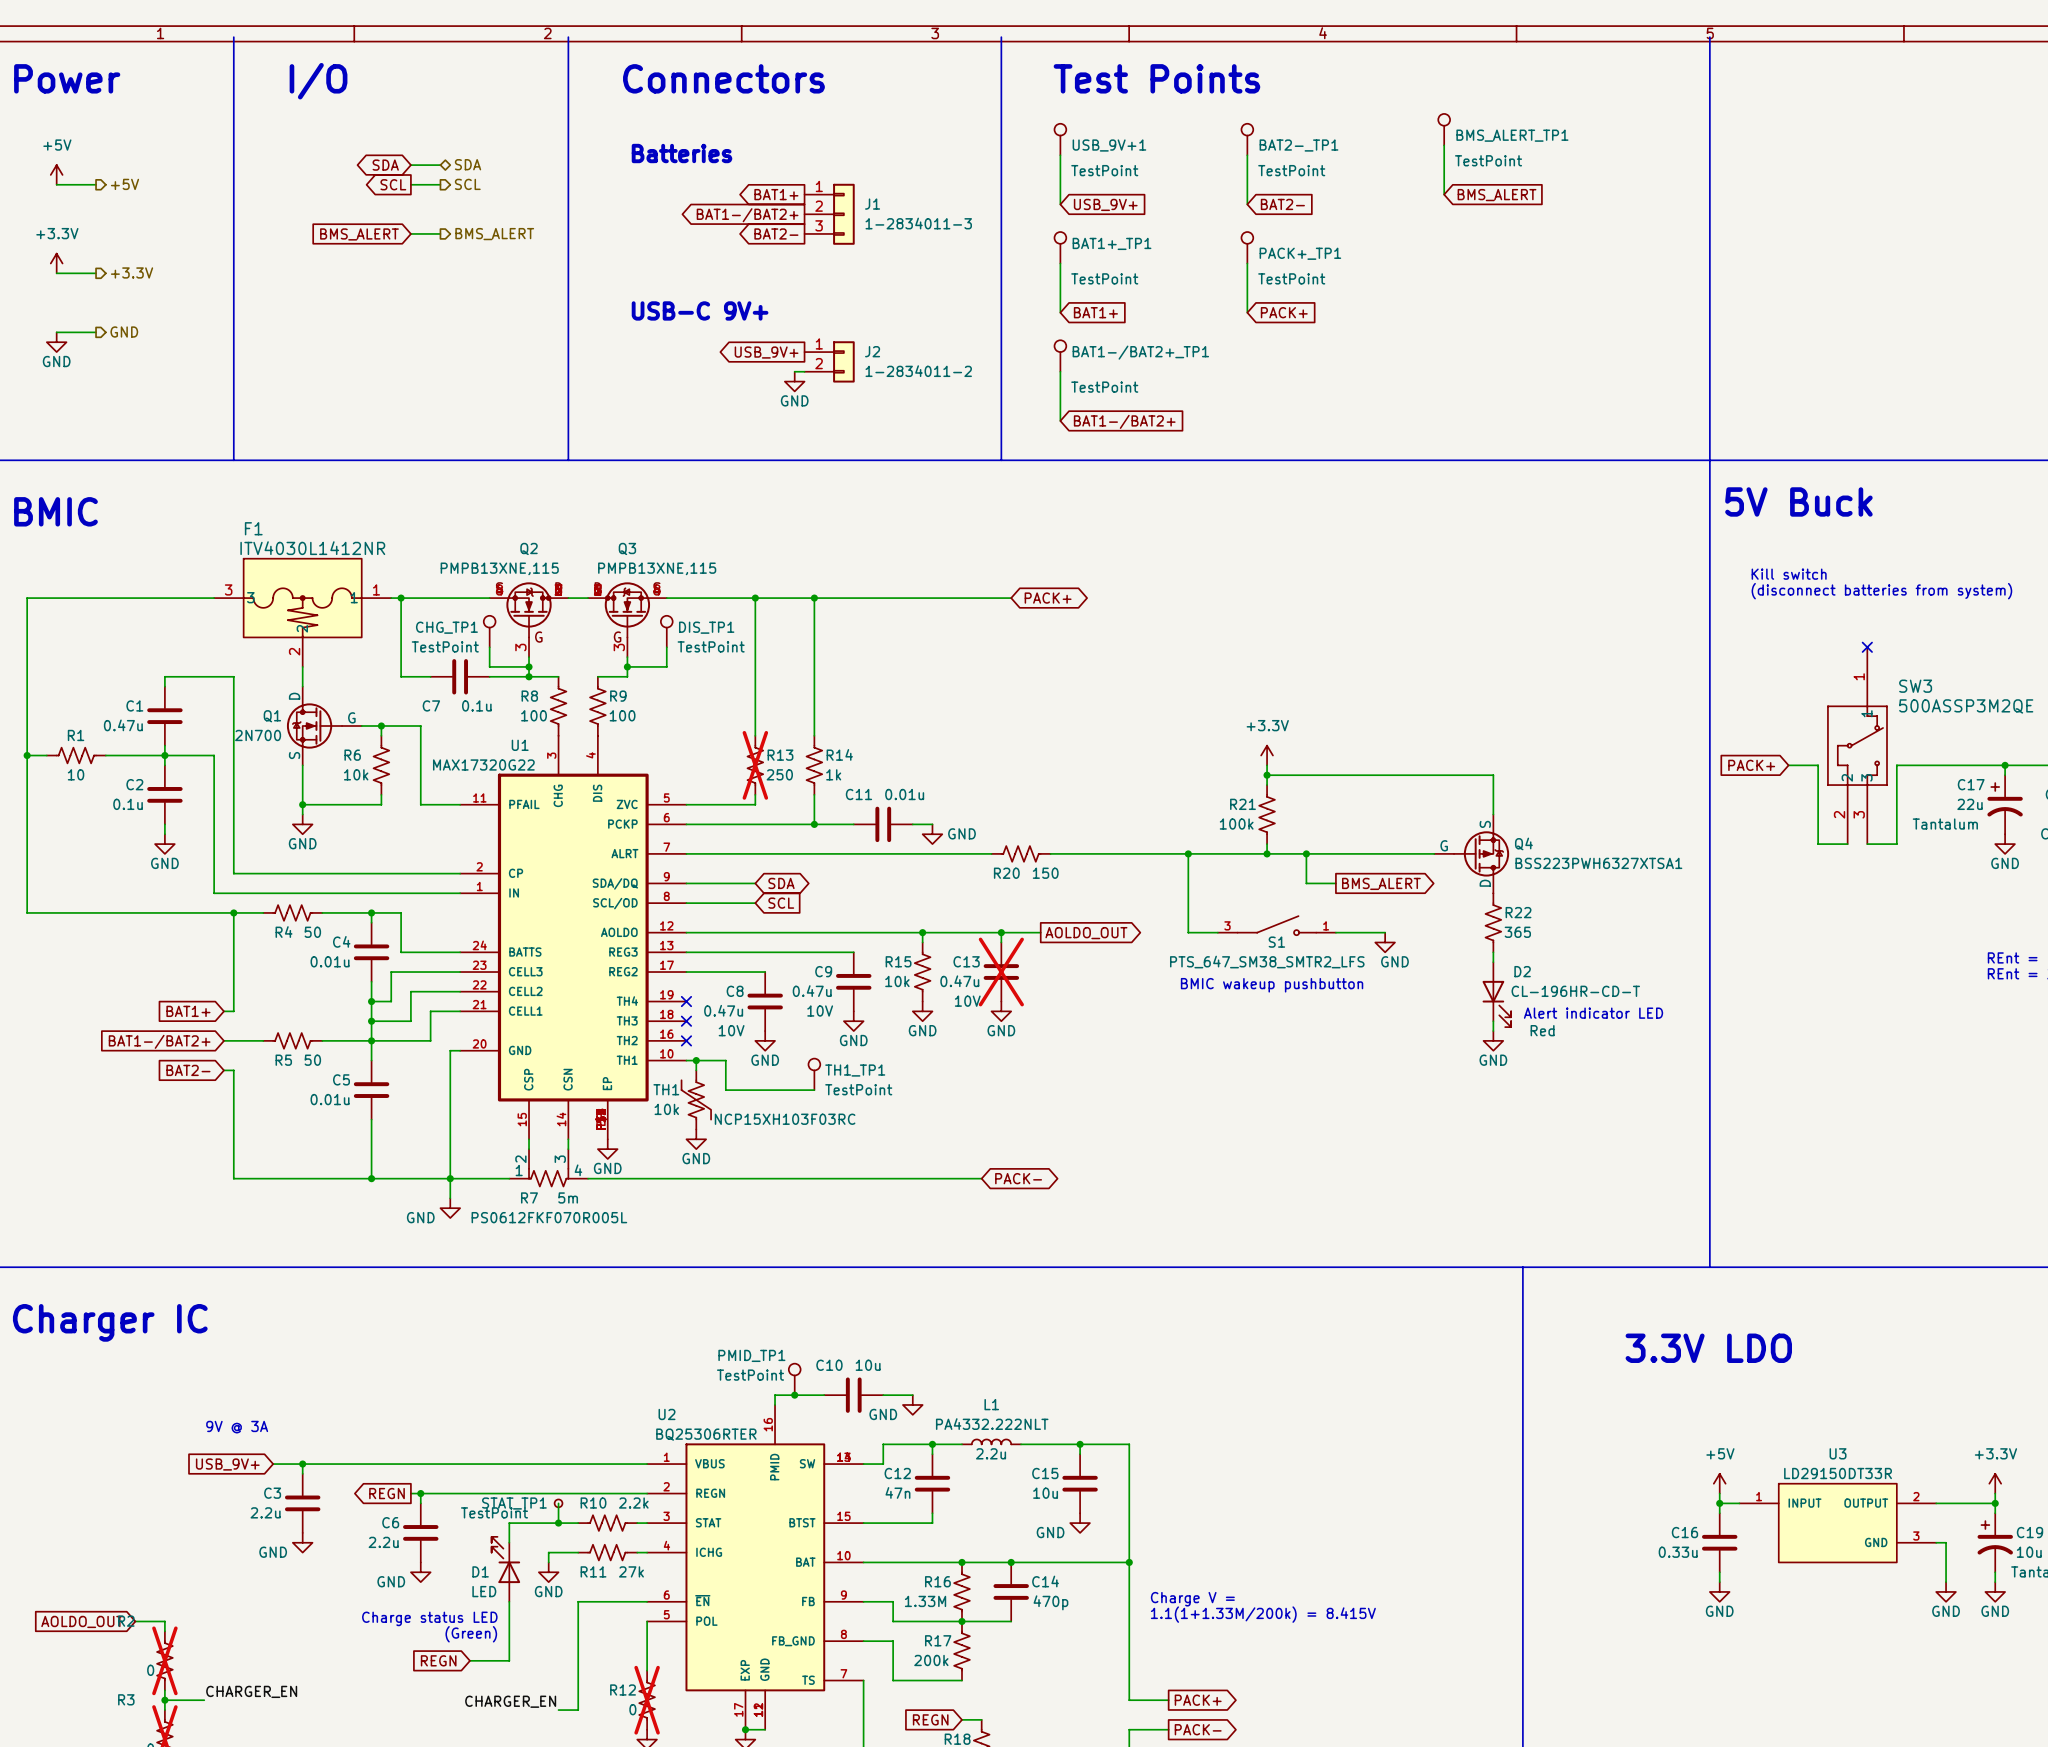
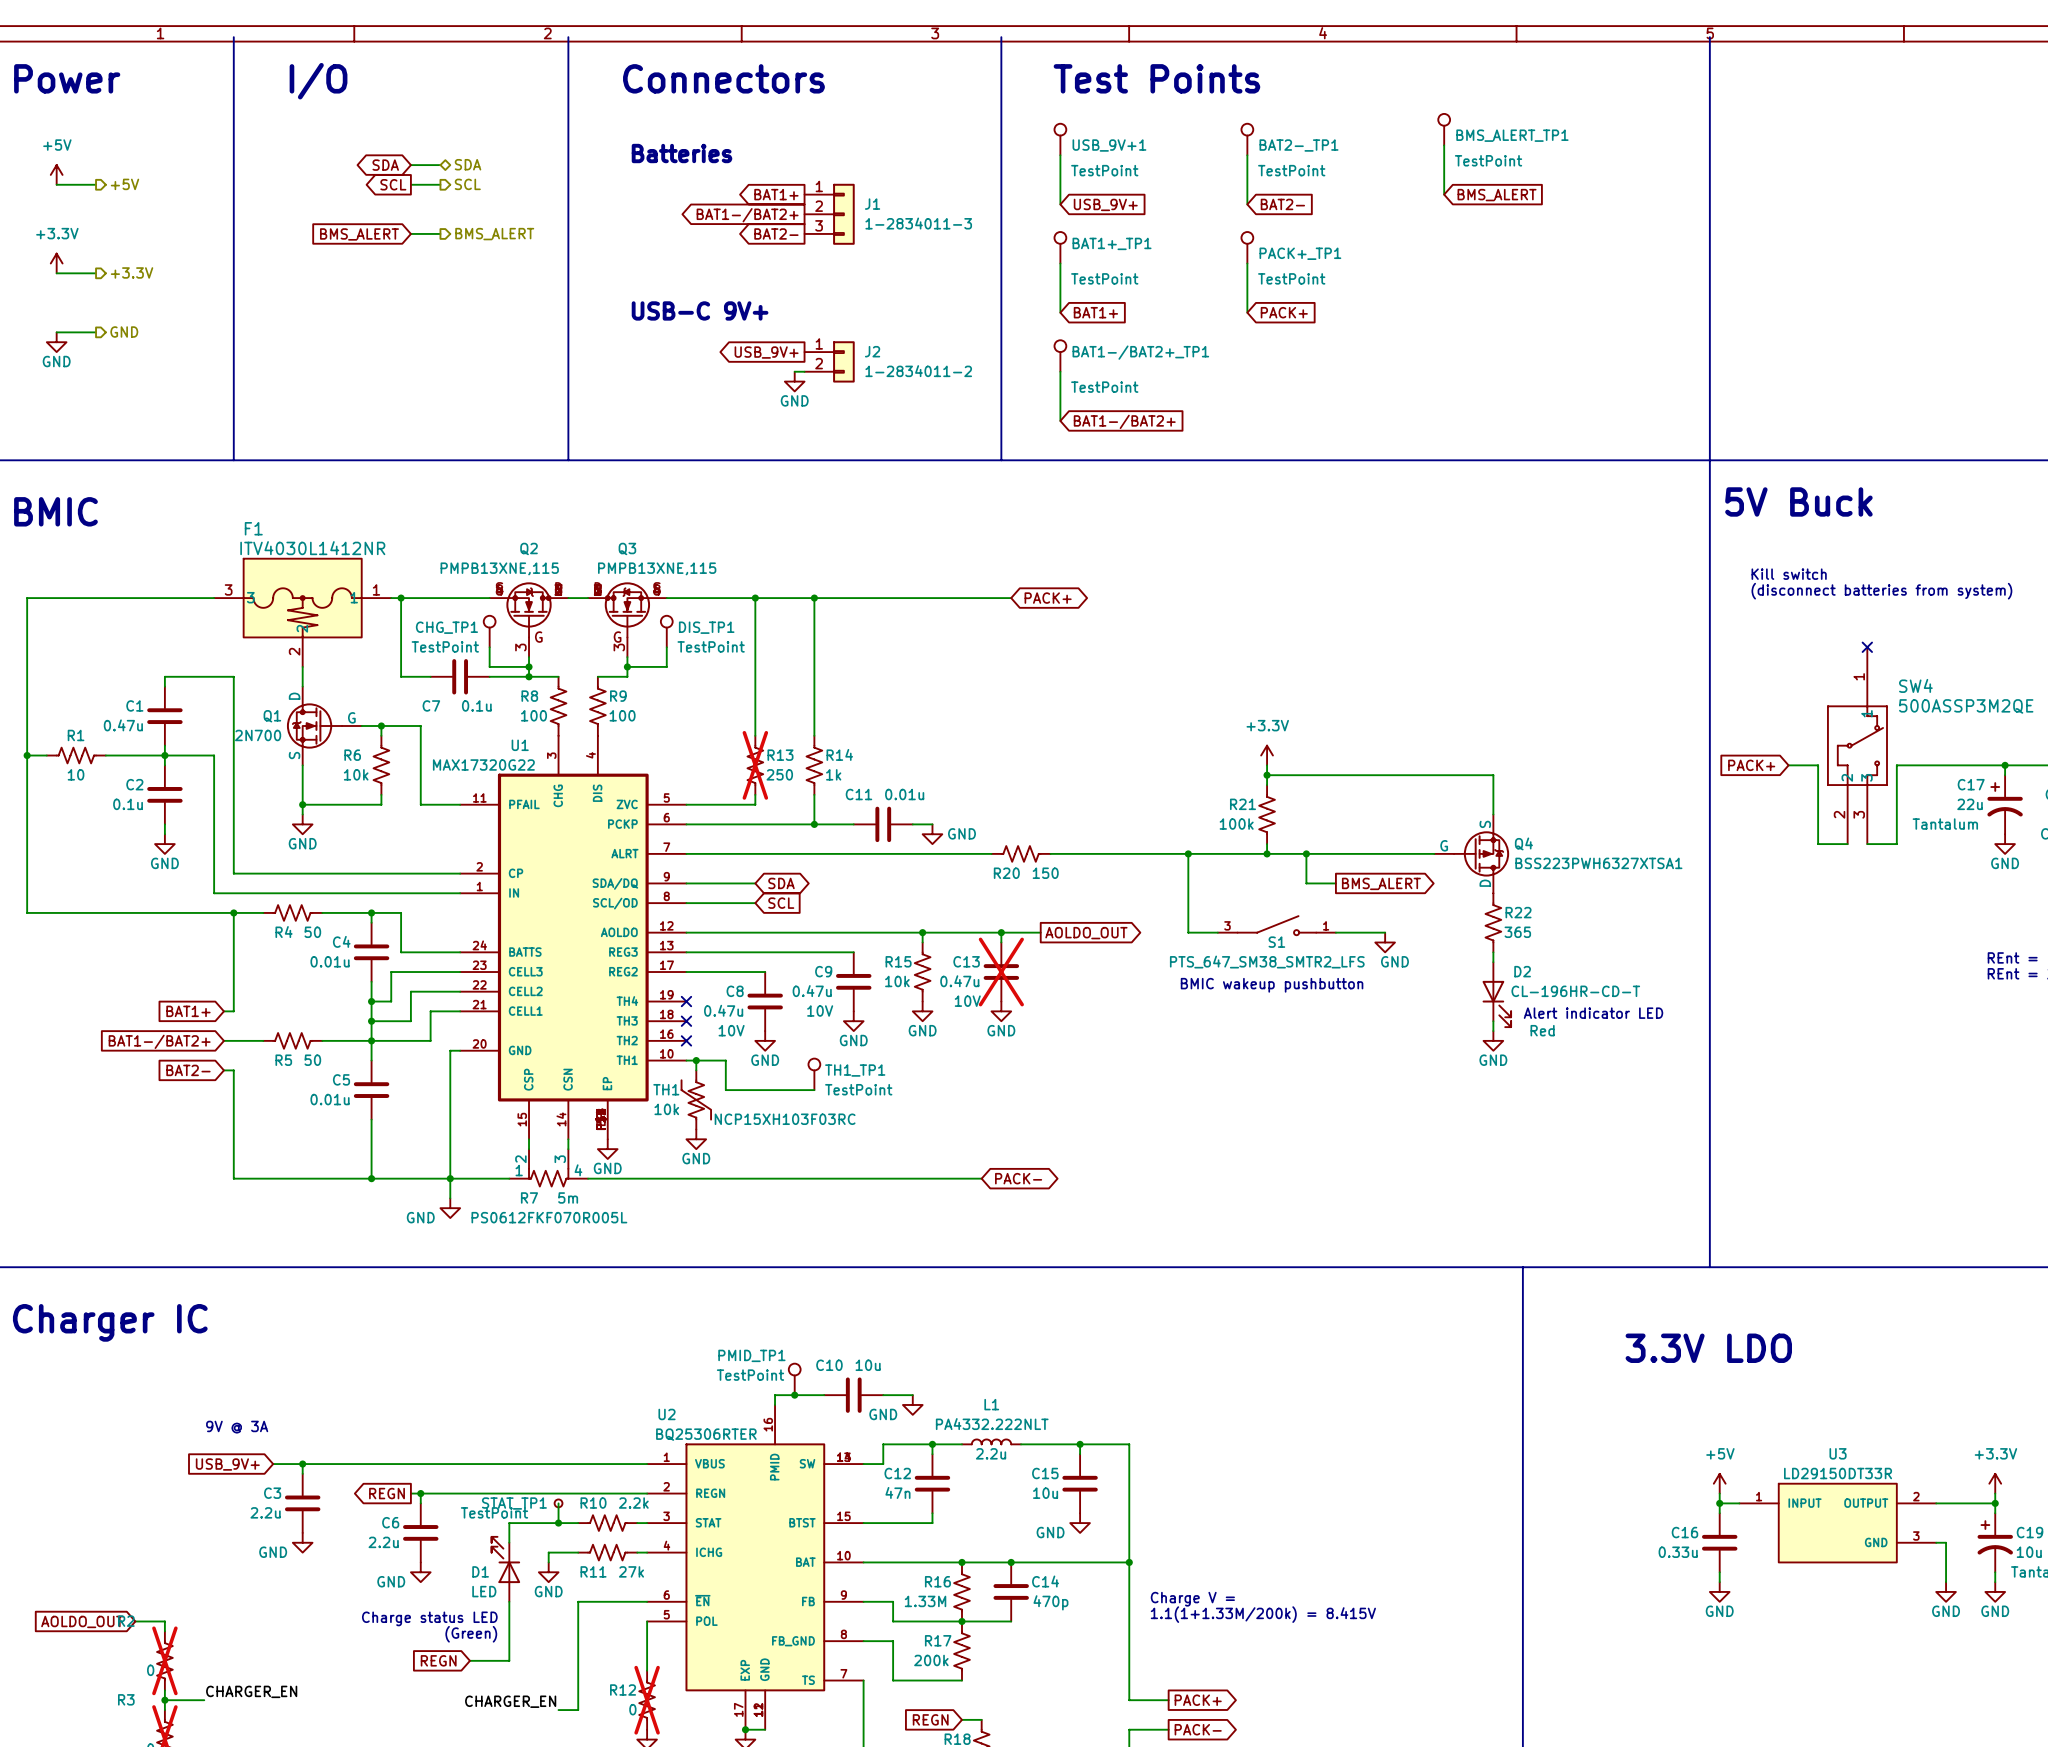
SW3 name: SW3 (1915, 686) -> SW4 (1915, 685)

